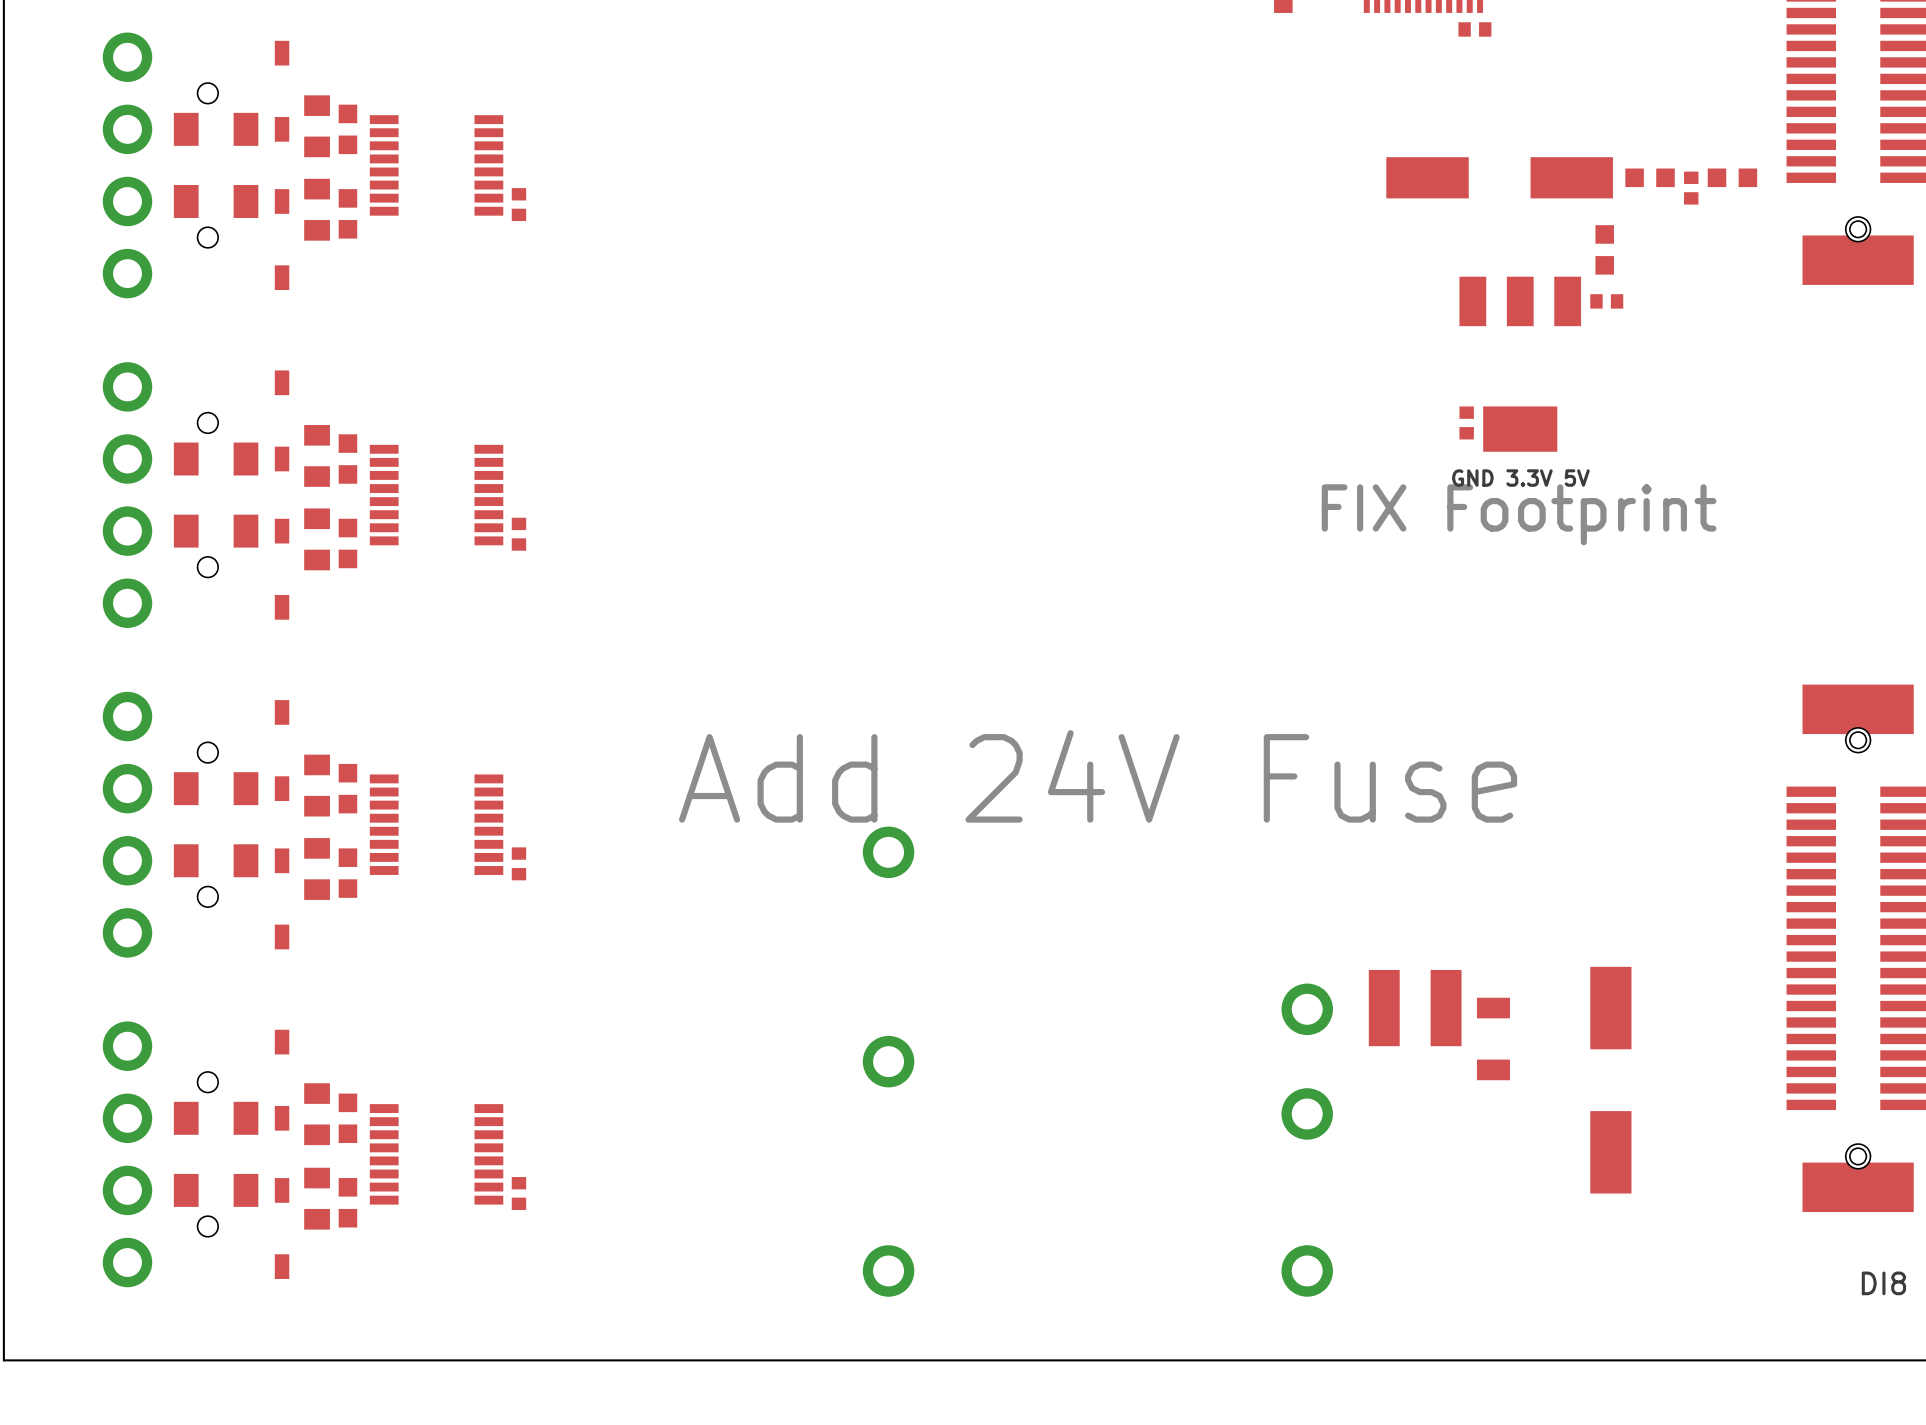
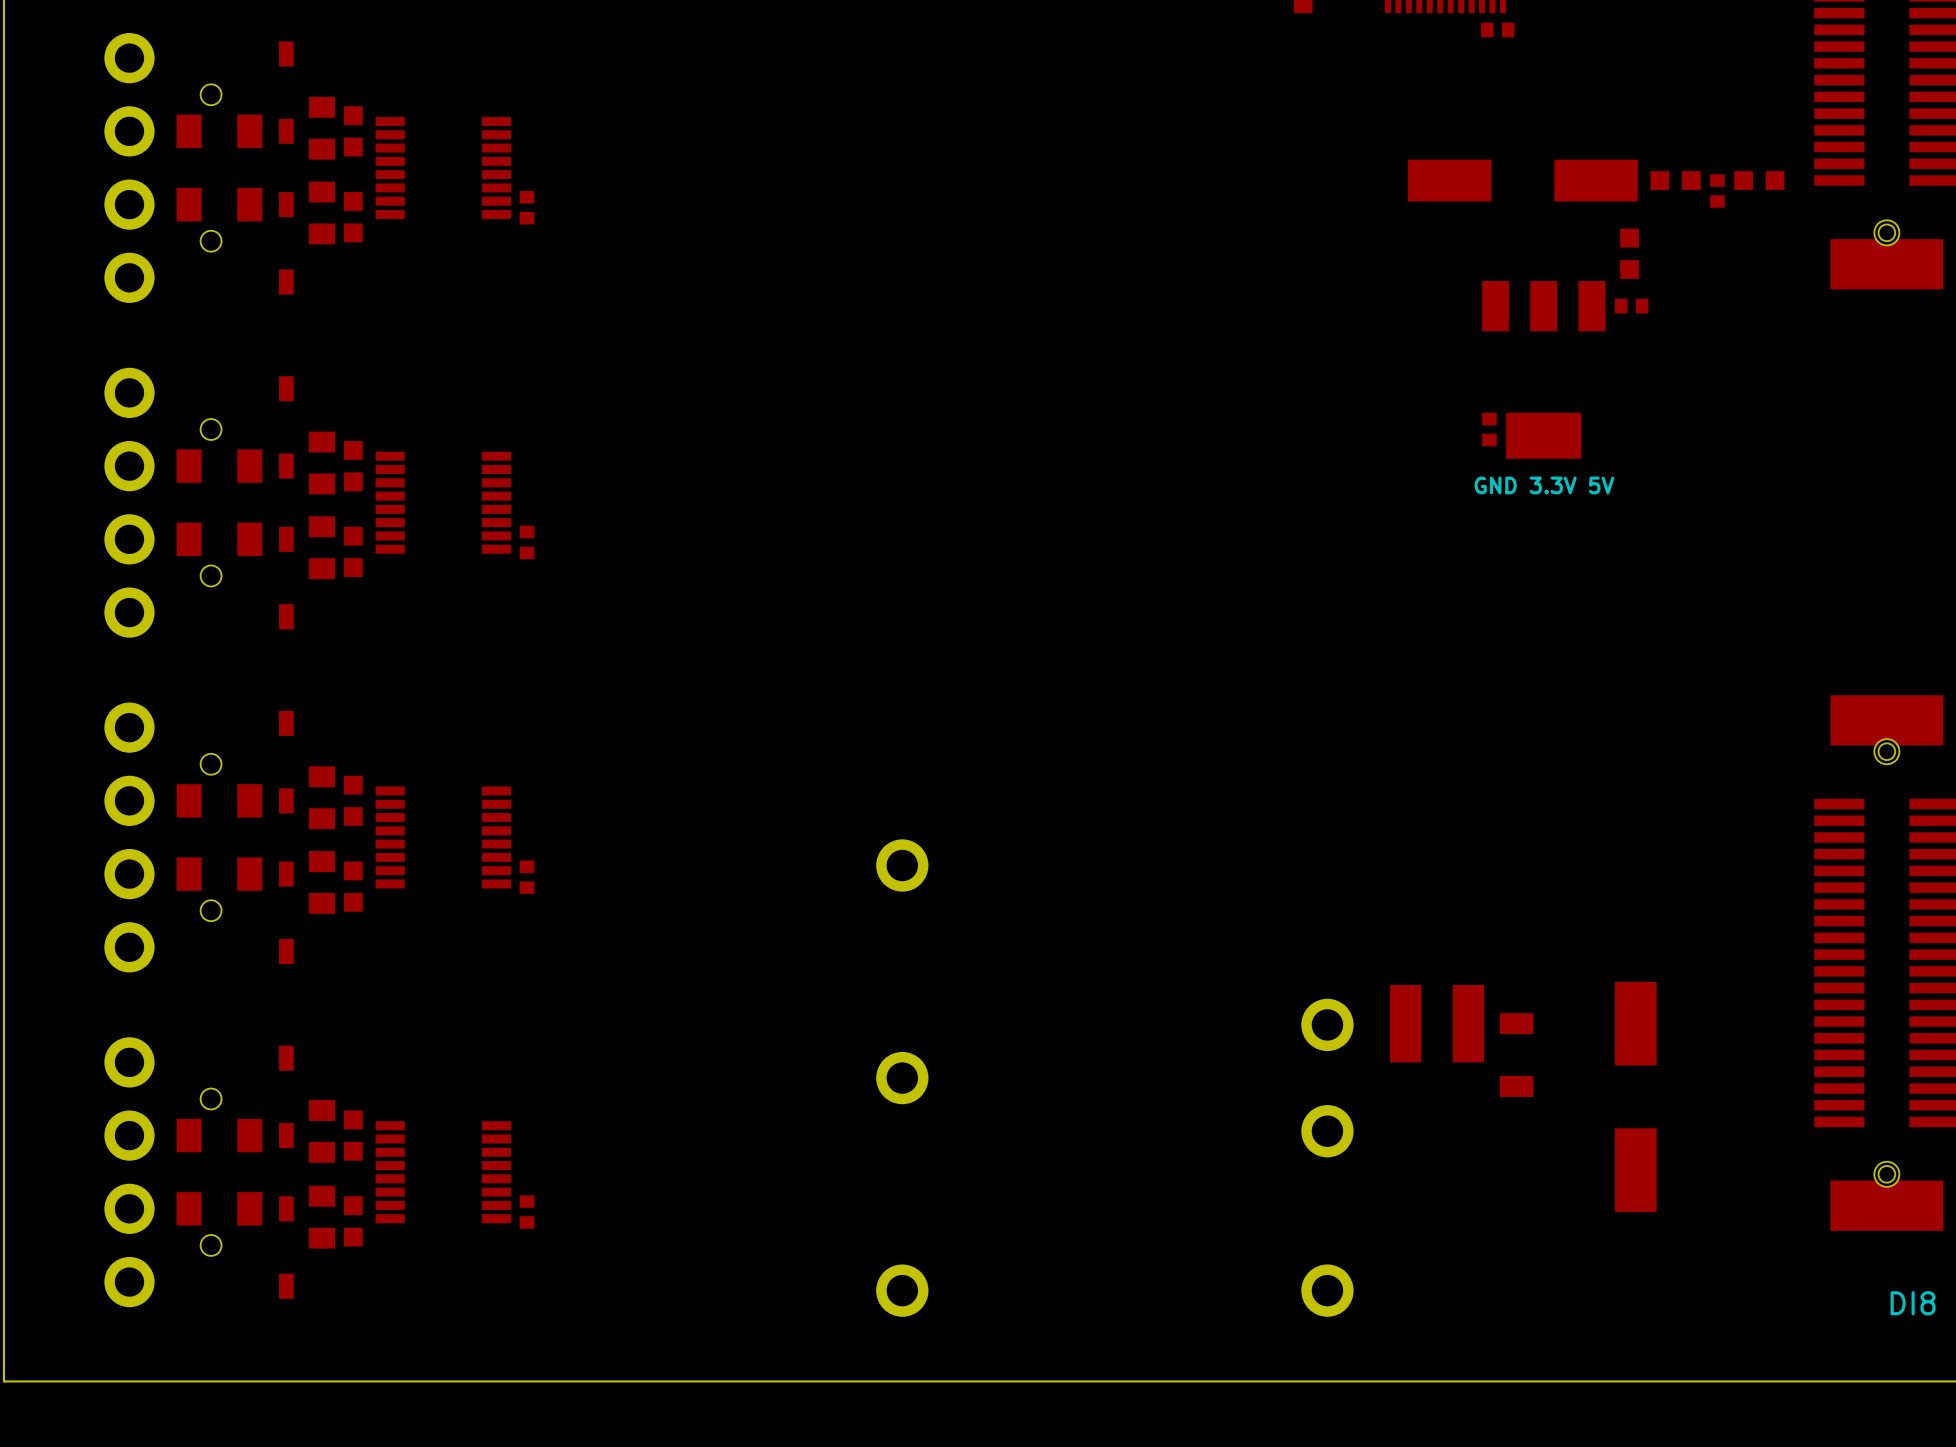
text: FIX Footprint (1519, 514) -> none
text: Add 24V Fuse (1098, 776) -> none

